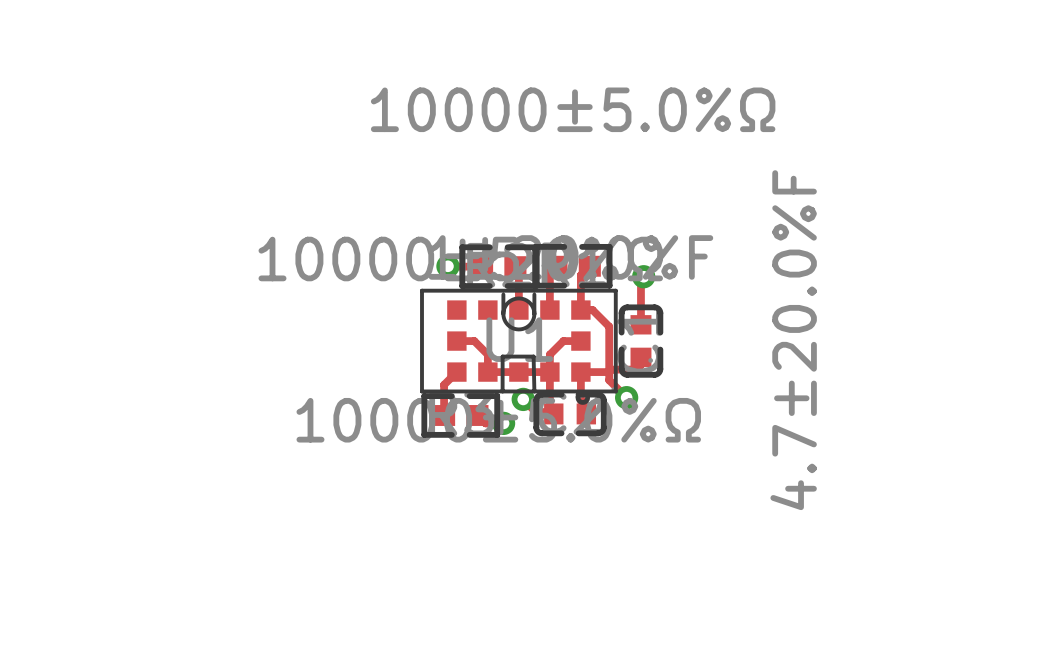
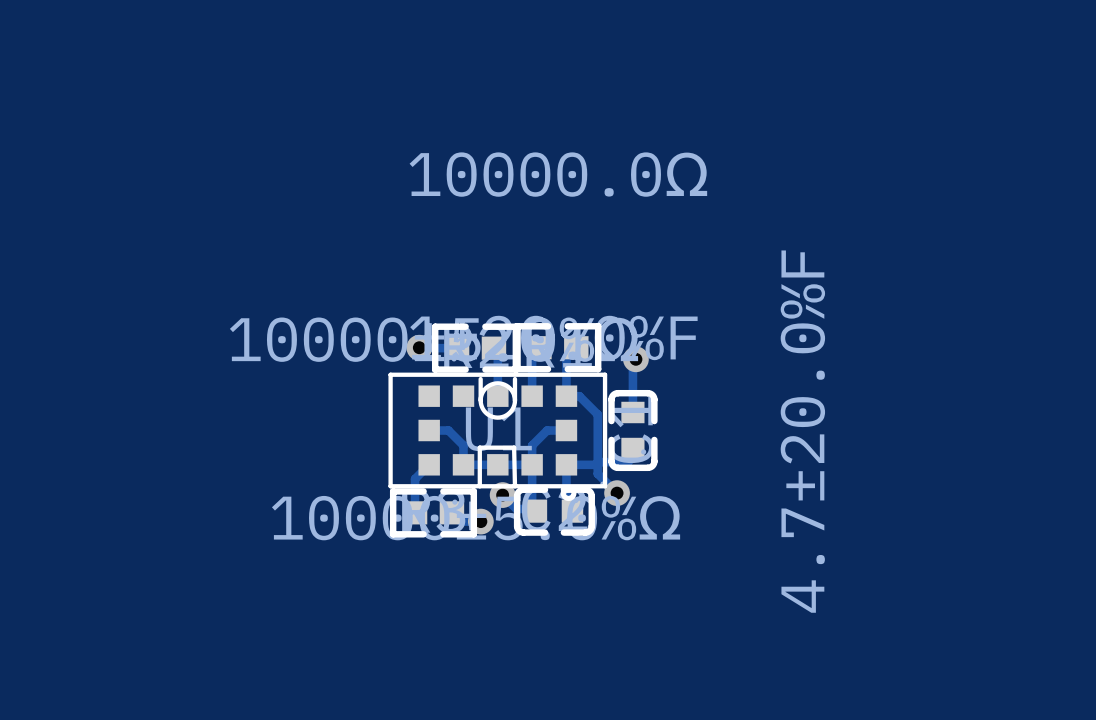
part value: 10000±5.0%Ω (573, 109) -> 10000.0Ω (558, 174)

